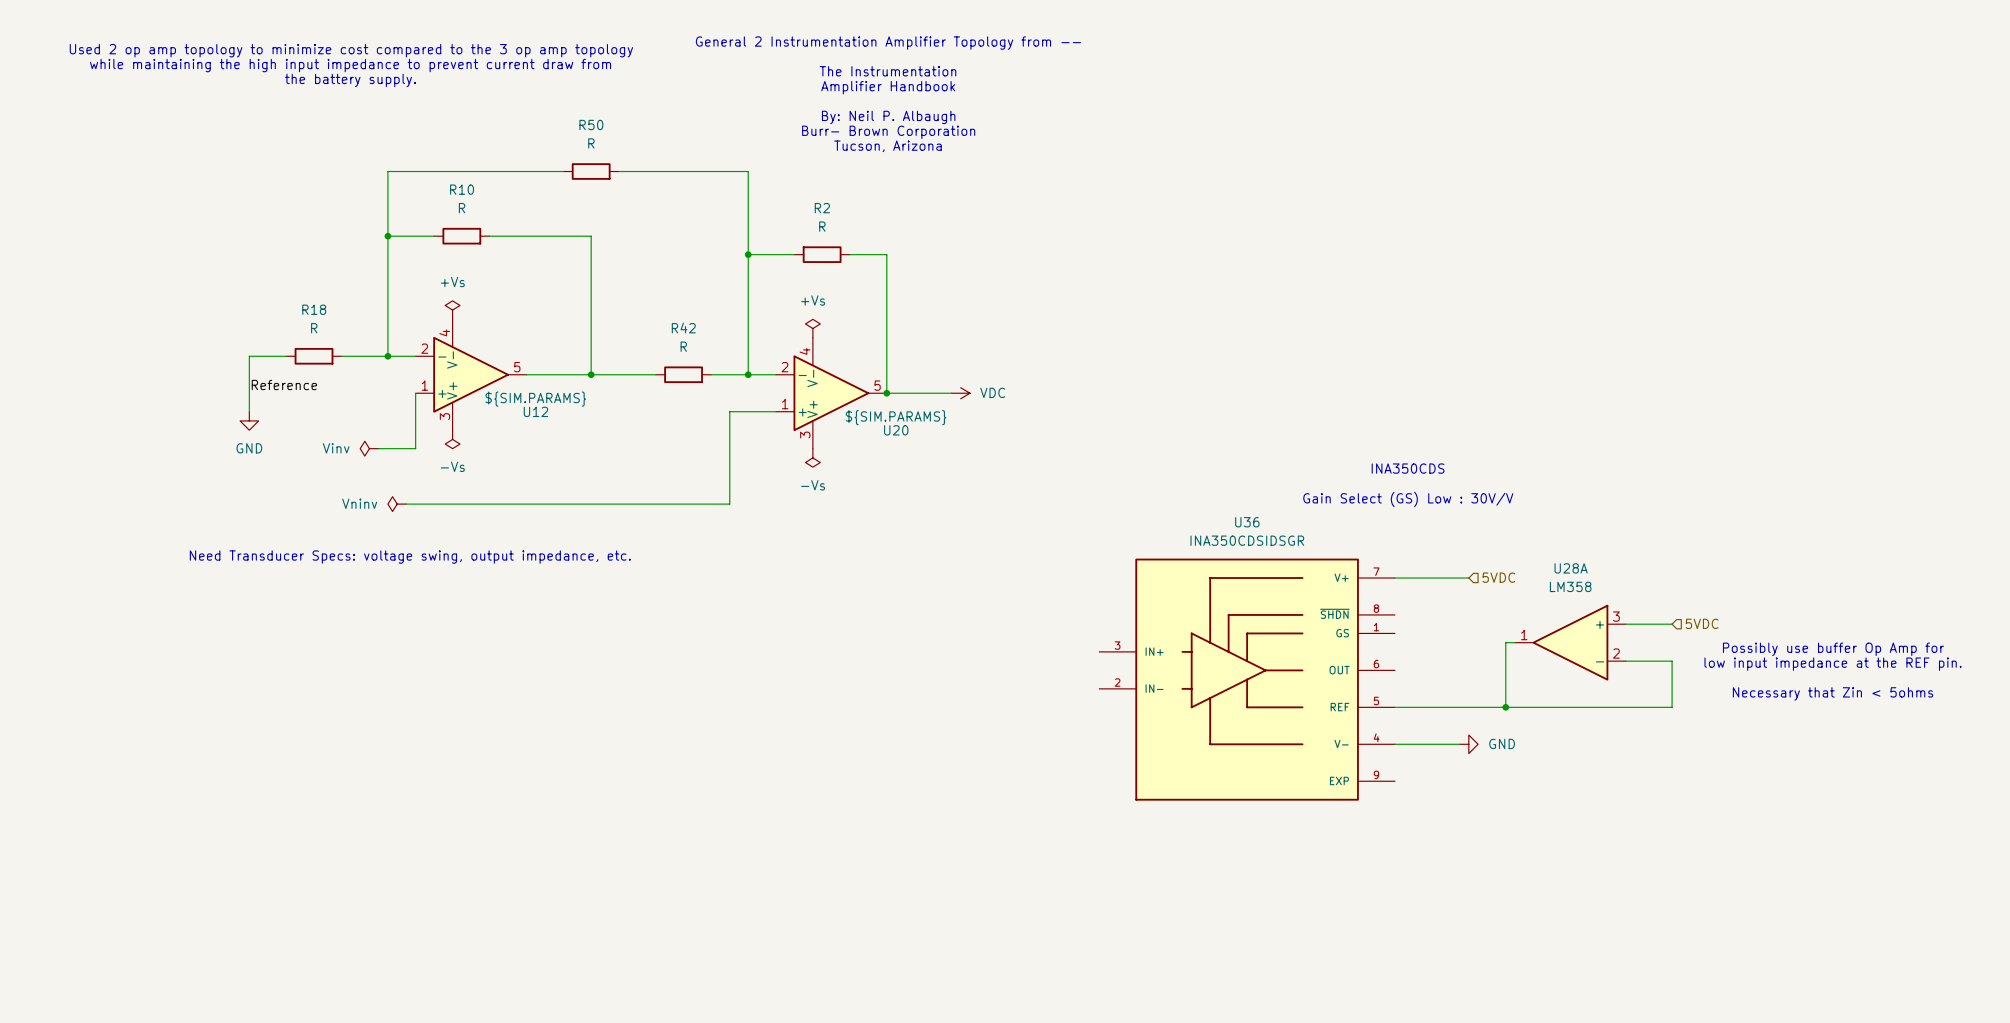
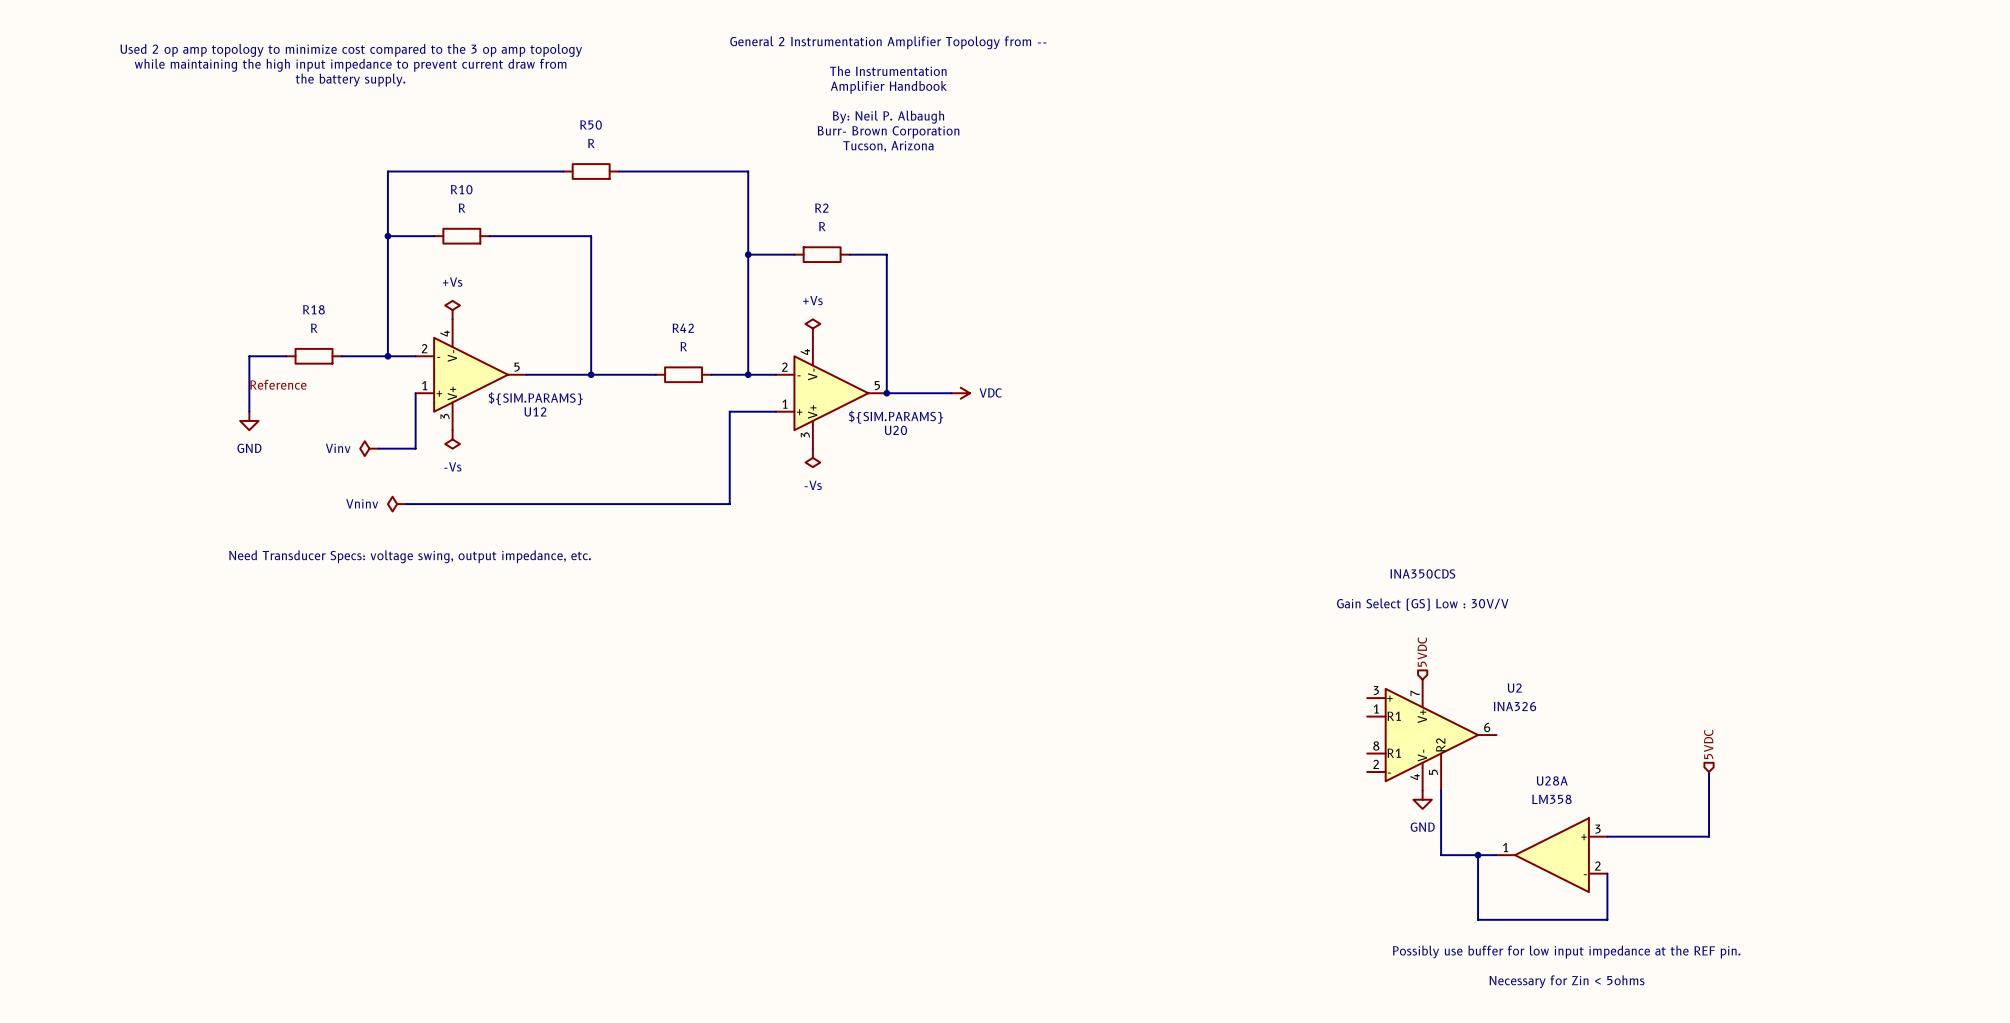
text position: INA350CDS (1408, 468) -> INA350CDS (1422, 573)
text position: Gain Select (GS) Low : 30V/V (1408, 499) -> Gain Select (GS) Low : 30V/V (1422, 604)
hierarchical label rotation: 0° (1498, 577) -> 90° counterclockwise (1422, 652)
hierarchical label position: 5VDC (1498, 577) -> 5VDC (1422, 652)
wire: (1394, 578) (1468, 578) -> none
hierarchical label: 5VDC (1702, 623) -> none
wire: (1625, 624) (1672, 624) -> none
wire: (1515, 642) (1505, 642) (1505, 707) -> none
U28A position: (1570, 642) -> (1551, 855)
text: Possibly use buffer Op Amp for (1833, 649) -> none
wire: (1625, 661) (1672, 661) (1672, 707) (1394, 707) -> none
text: low input impedance at the REF pin. (1833, 664) -> none
U36: INA350CDSIDSGR (1247, 679) -> none
text: Necessary that Zin < 5ohms (1833, 693) -> none
junction: (1505, 707) -> none
U2: none -> INA326 (1431, 735)
hierarchical label: none -> 5VDC (1708, 744)
power symbol rotation: 0° (1468, 744) -> 90° clockwise (1422, 799)
power symbol position: GND (1468, 744) -> GND (1422, 799)
wire: none -> (1709, 772) (1709, 836) (1607, 836)
wire: none -> (1441, 790) (1441, 855) (1496, 855)
wire: none -> (1478, 855) (1478, 919) (1607, 919) (1607, 873)
junction: none -> (1478, 855)
text: none -> Possibly use buffer for low input impedance at the REF pin. (1566, 952)
text: none -> Necessary for Zin < 5ohms (1566, 981)

